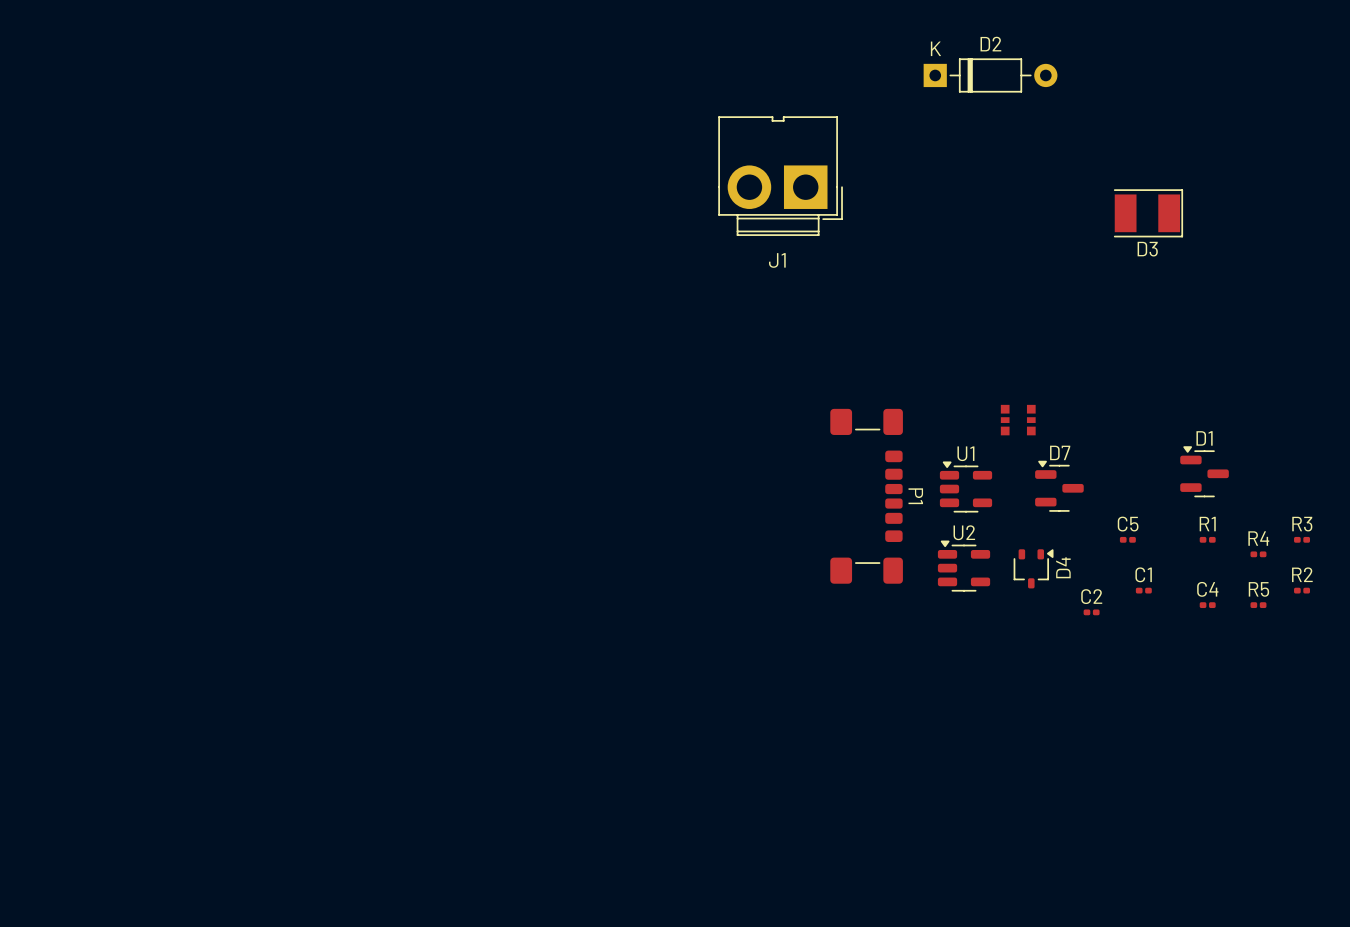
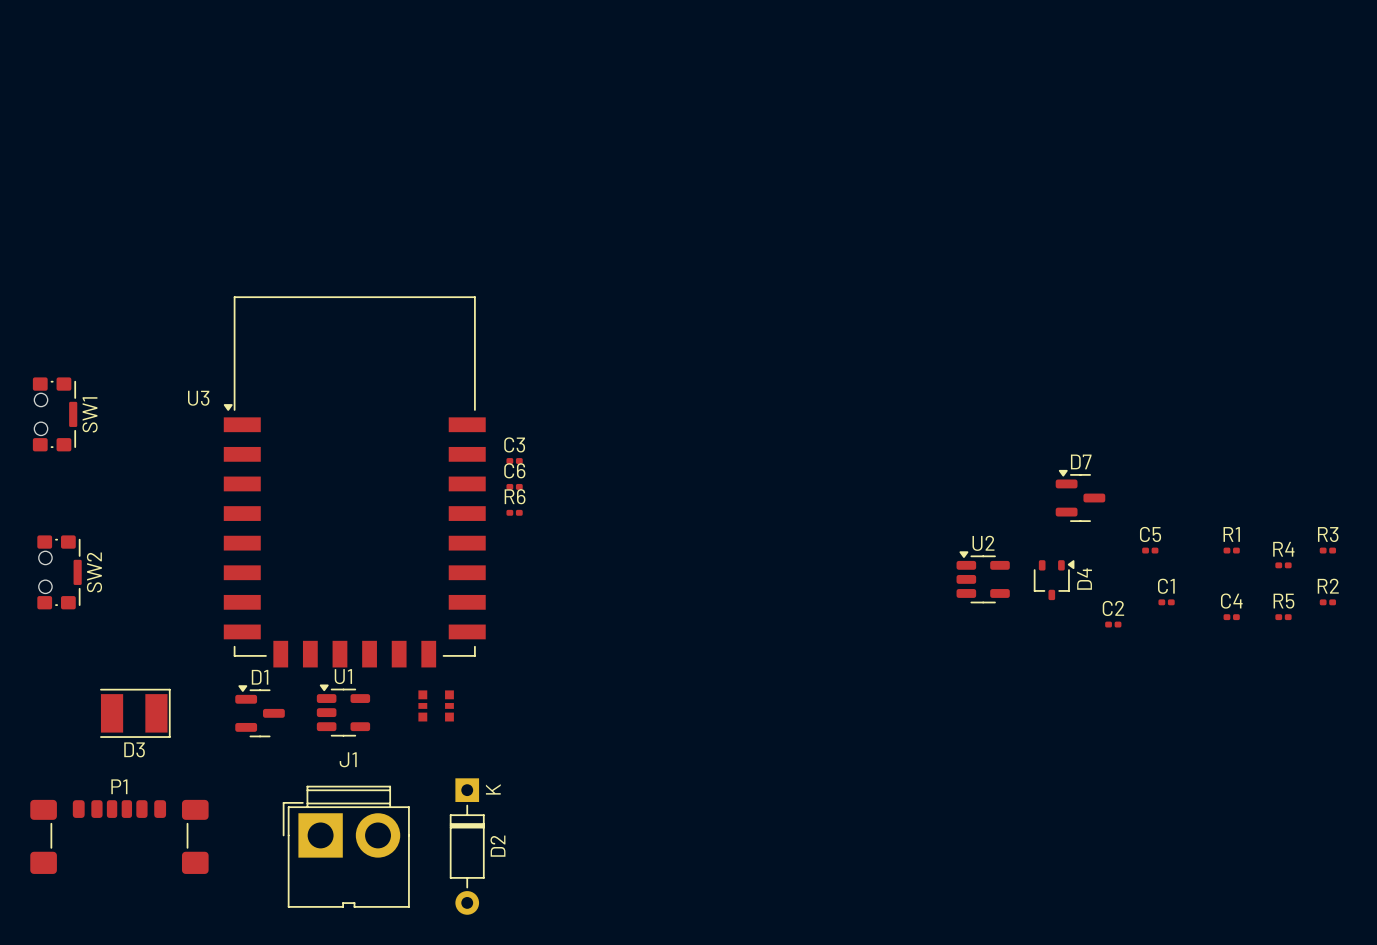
D2 rotation: 0° (990, 75) -> 90° clockwise (467, 846)
D2 position: (990, 75) -> (467, 846)
J1 rotation: 0° (780, 176) -> 180° (346, 846)
J1 position: (780, 176) -> (346, 846)
D3 position: (1148, 213) -> (135, 713)
SW1: none -> (55, 414)
part: (1018, 420) -> none
C3: none -> (514, 461)
D1 position: (1204, 471) -> (260, 711)
U3: none -> (354, 481)
C6: none -> (514, 486)
U1 position: (966, 487) -> (343, 710)
P1 rotation: 0° (866, 496) -> 90° counterclockwise (119, 836)
P1 position: (866, 496) -> (119, 836)
R6: none -> (514, 512)
SW2: none -> (59, 572)
part: none -> (436, 705)

